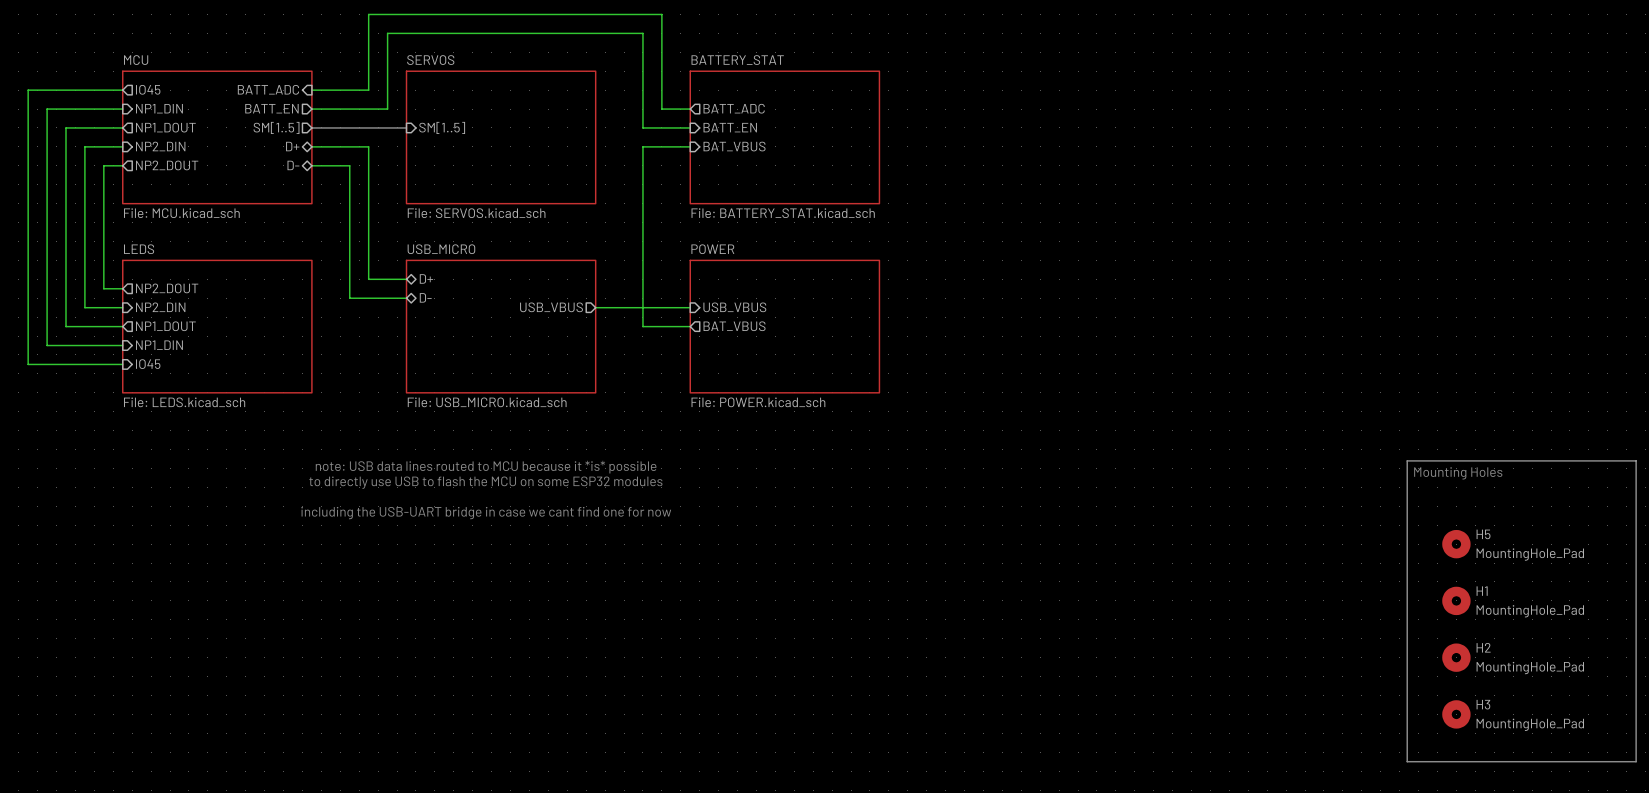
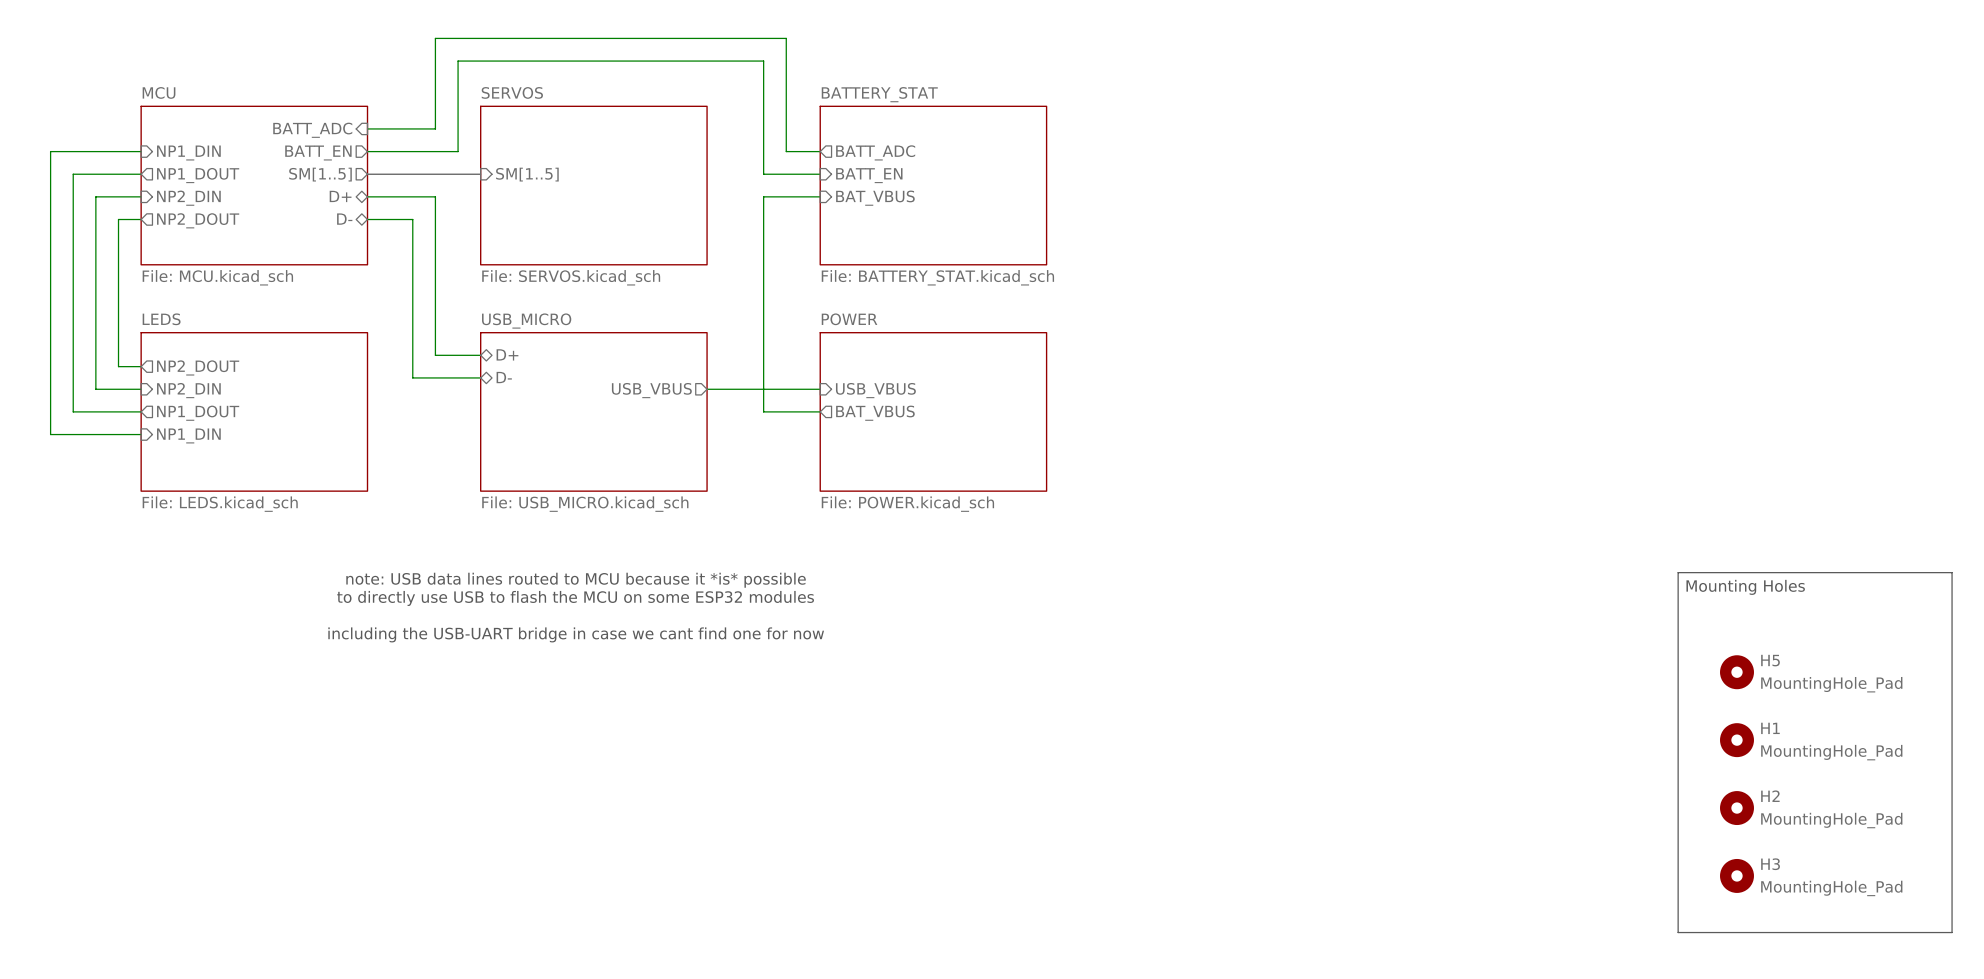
sheet pin: IO45 (148, 89) -> none
wire: (122, 90) (28, 90) (28, 364) (122, 364) -> none
sheet pin: IO45 (148, 364) -> none

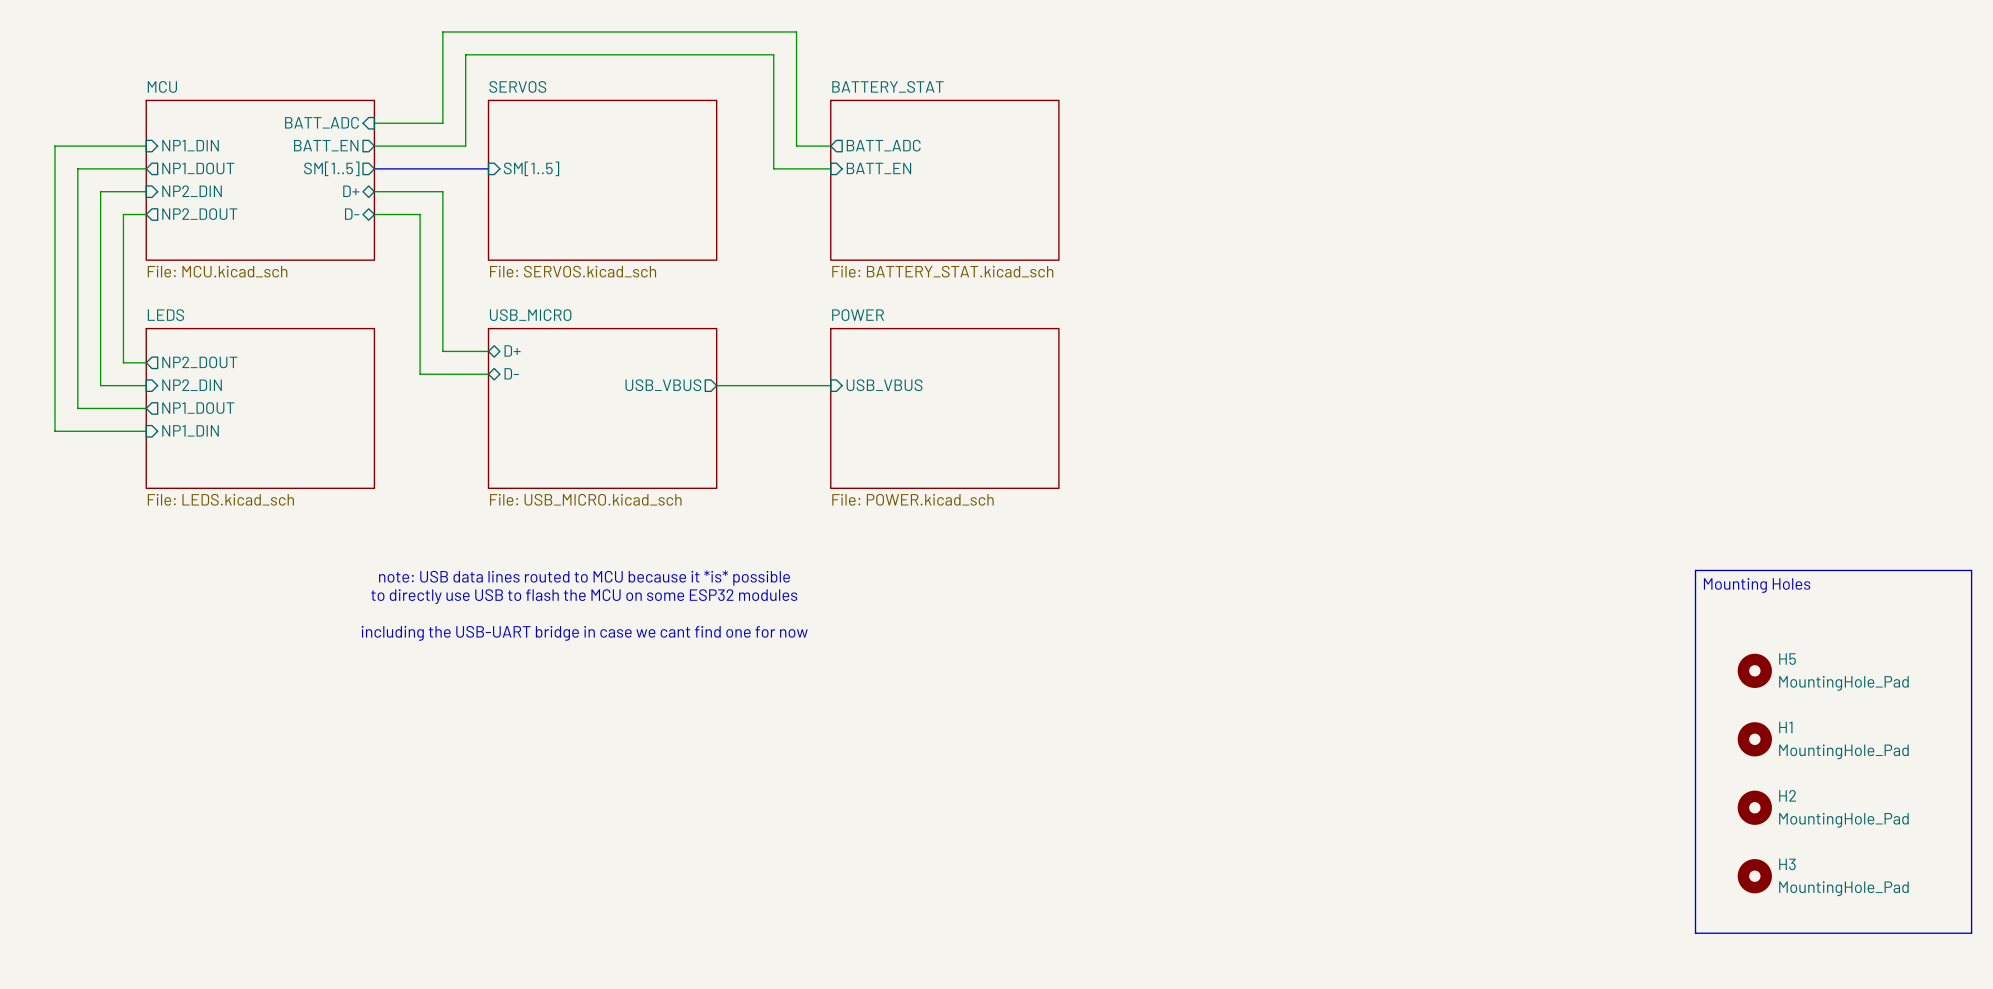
wire: (820, 196) (763, 196) (763, 411) (820, 411) -> none
sheet pin: BAT_VBUS (875, 198) -> none
sheet pin: BAT_VBUS (875, 413) -> none

